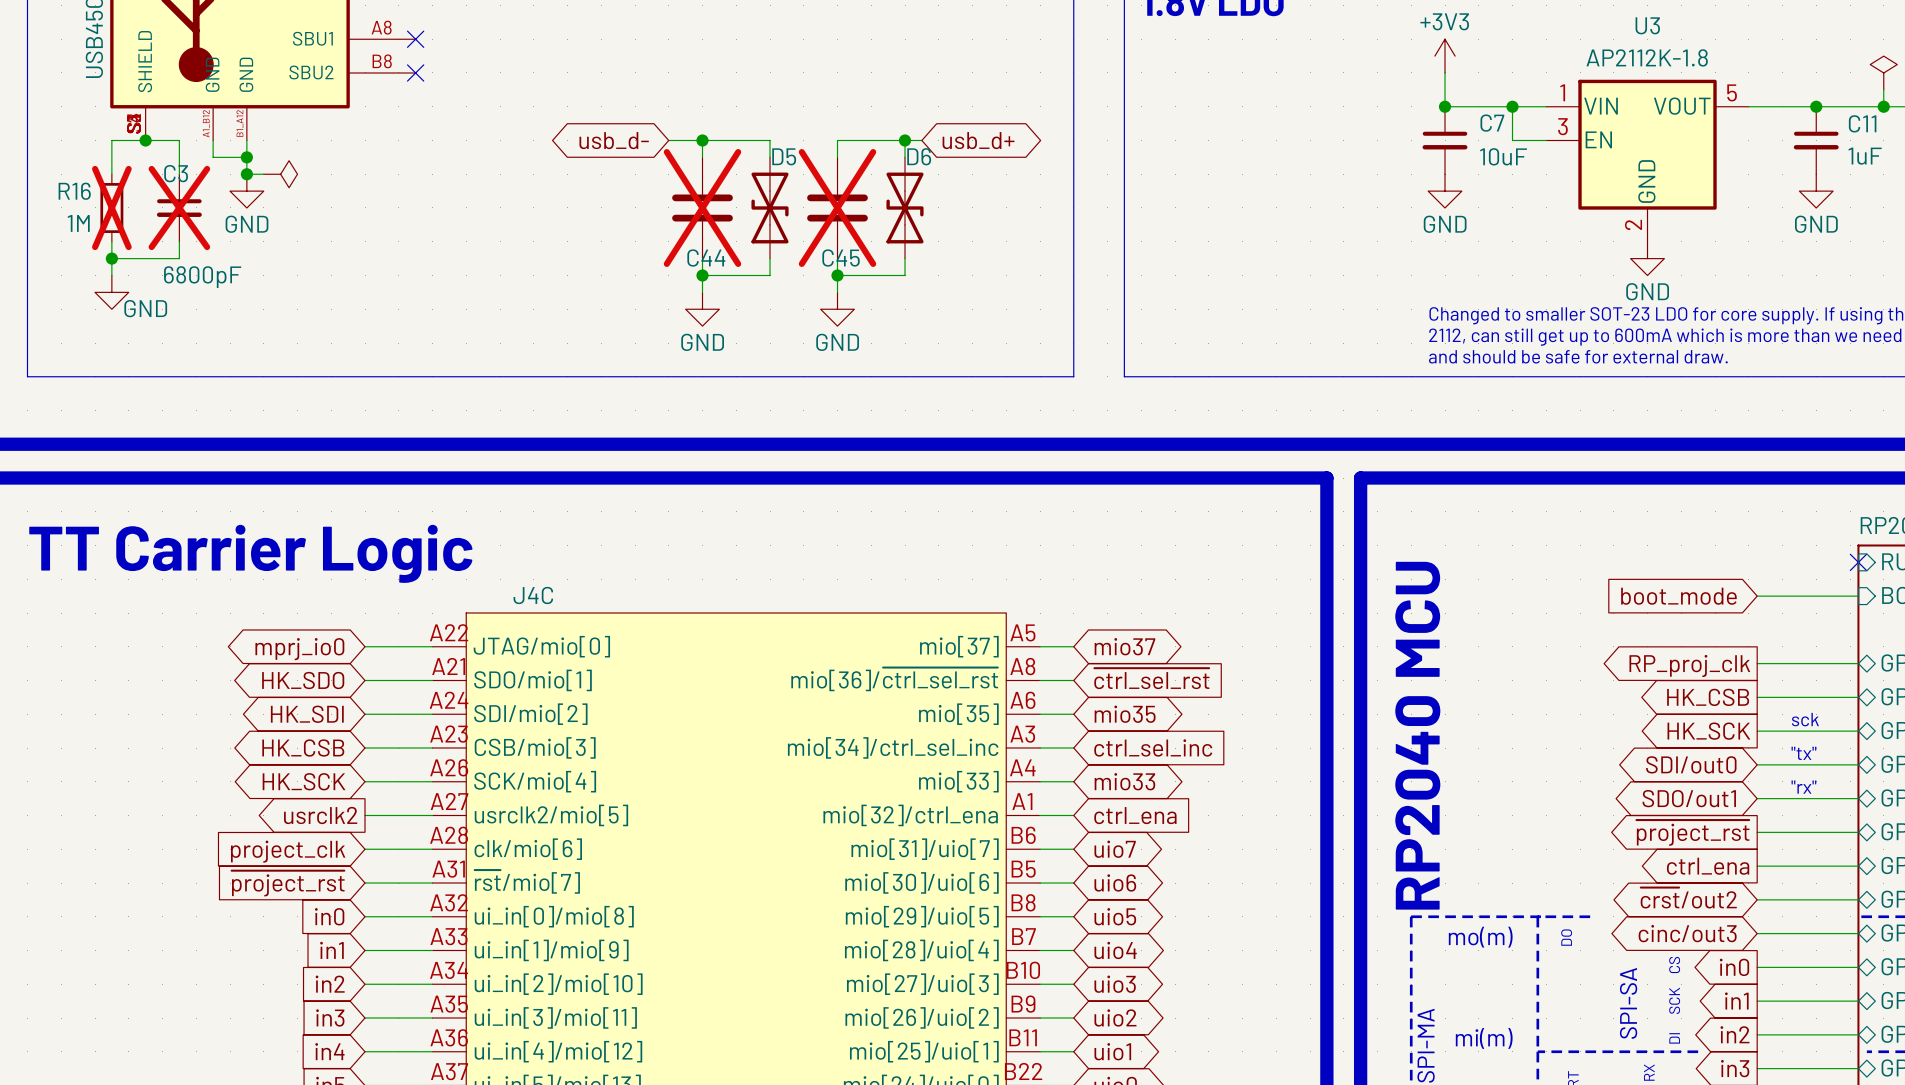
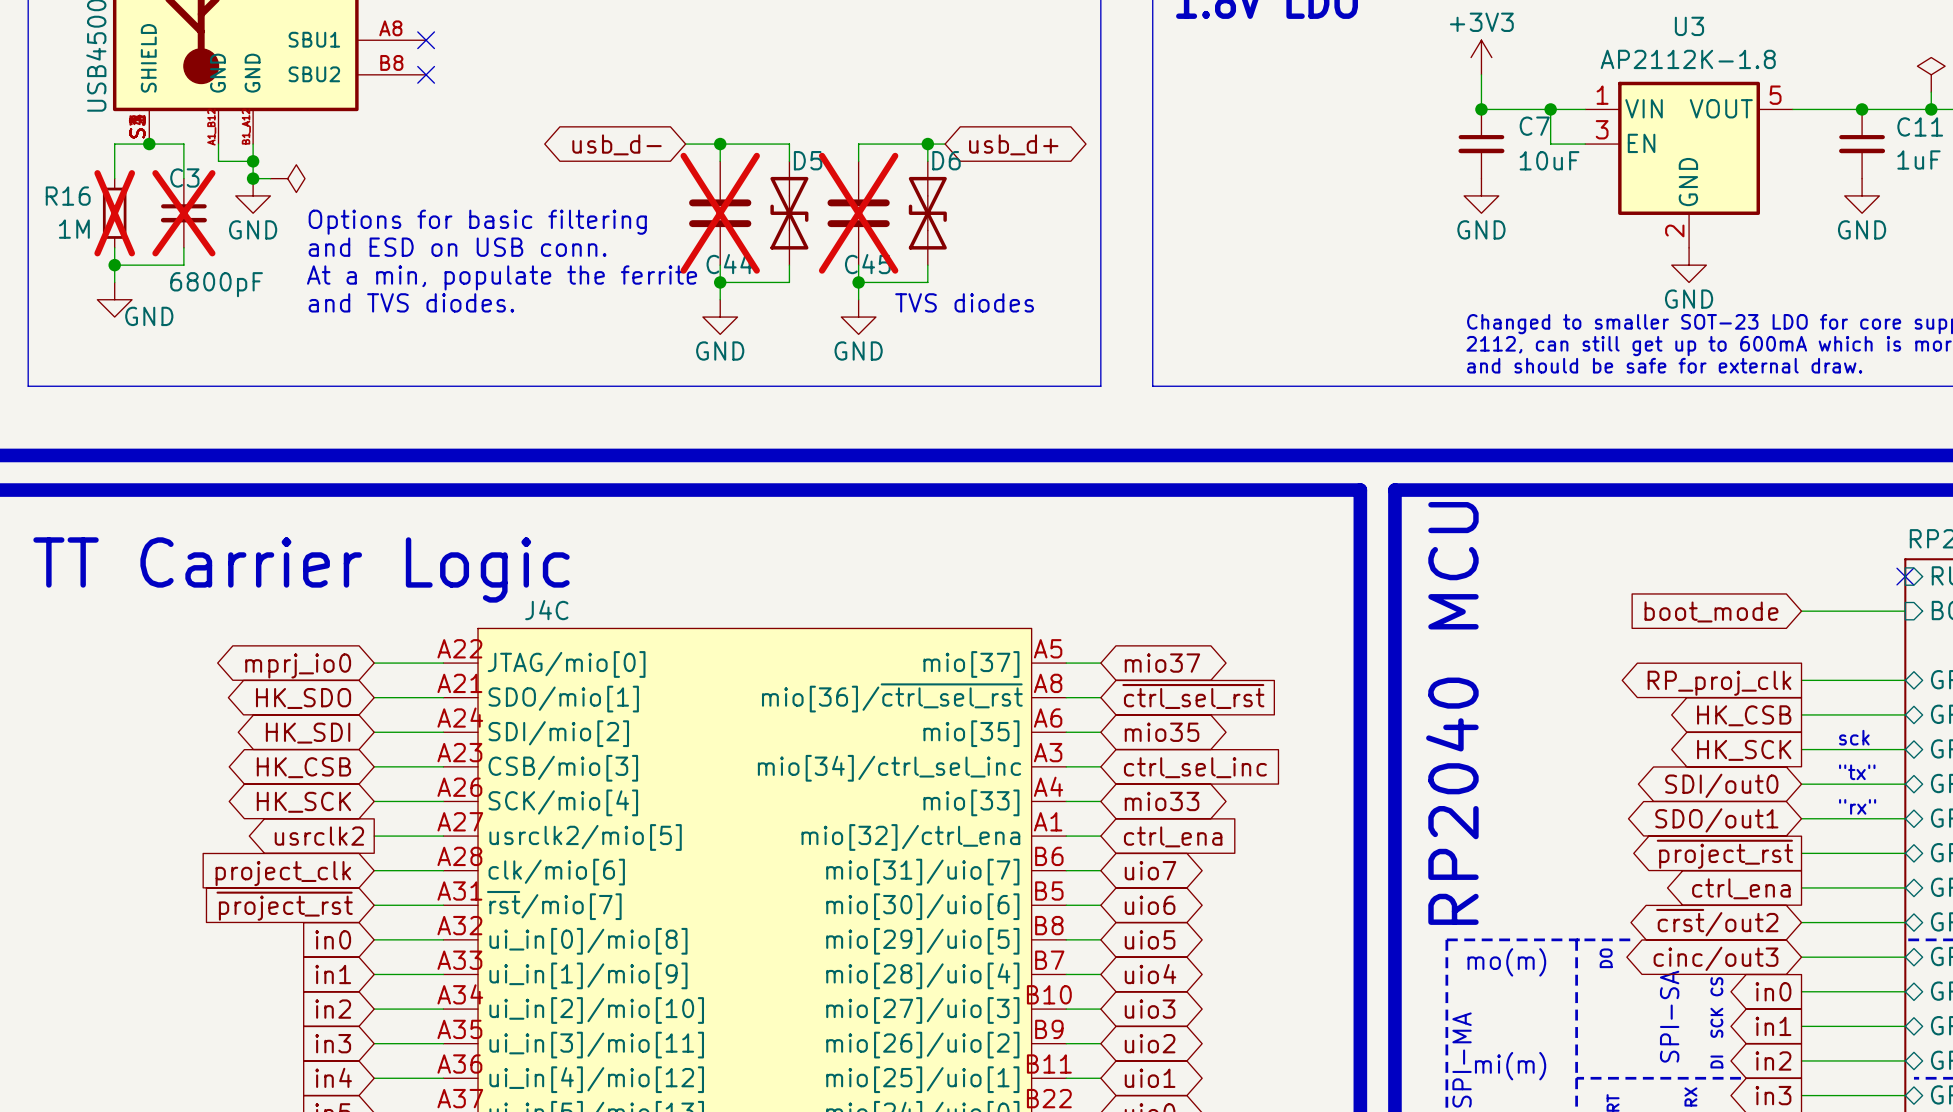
text: none -> Options for basic filtering (477, 222)
text: none -> and ESD on USB conn. (457, 247)
text: none -> At a min, populate the ferrite (502, 277)
text: none -> and TVS diodes. (411, 302)
text: none -> TVS diodes (964, 302)

